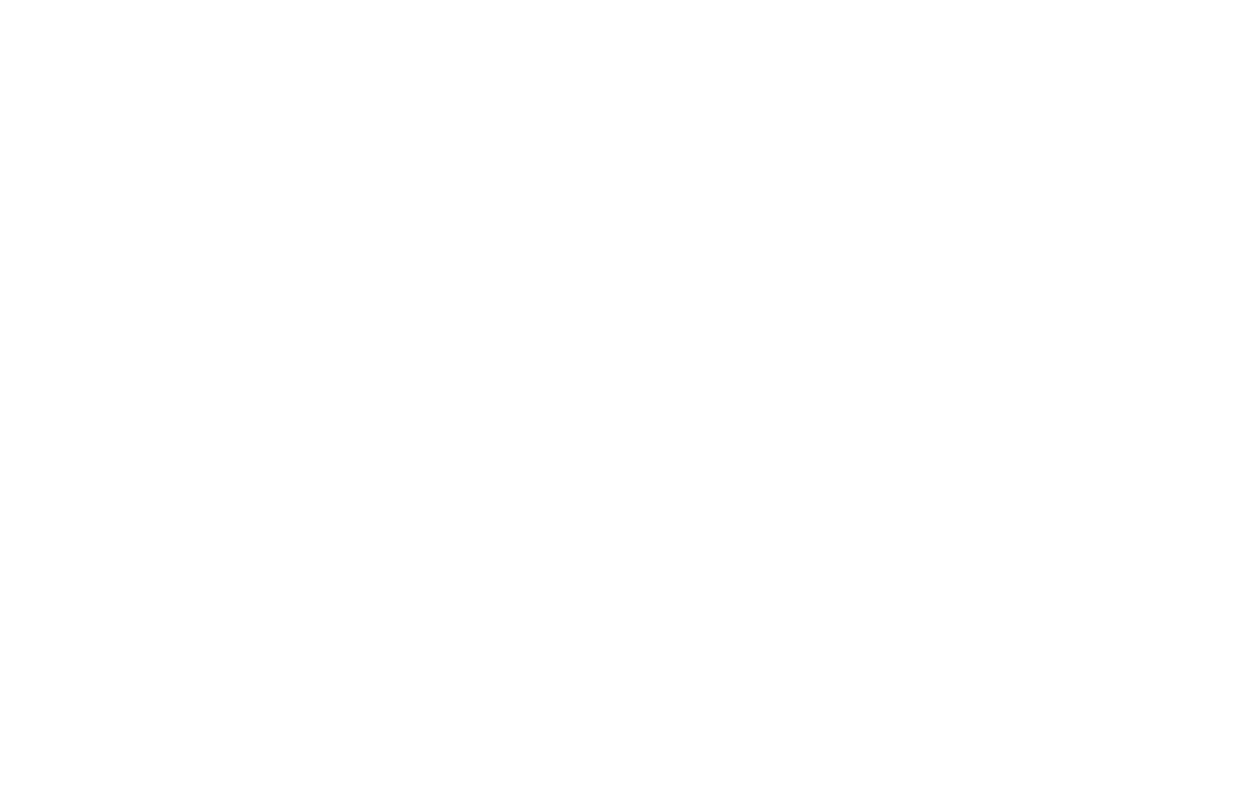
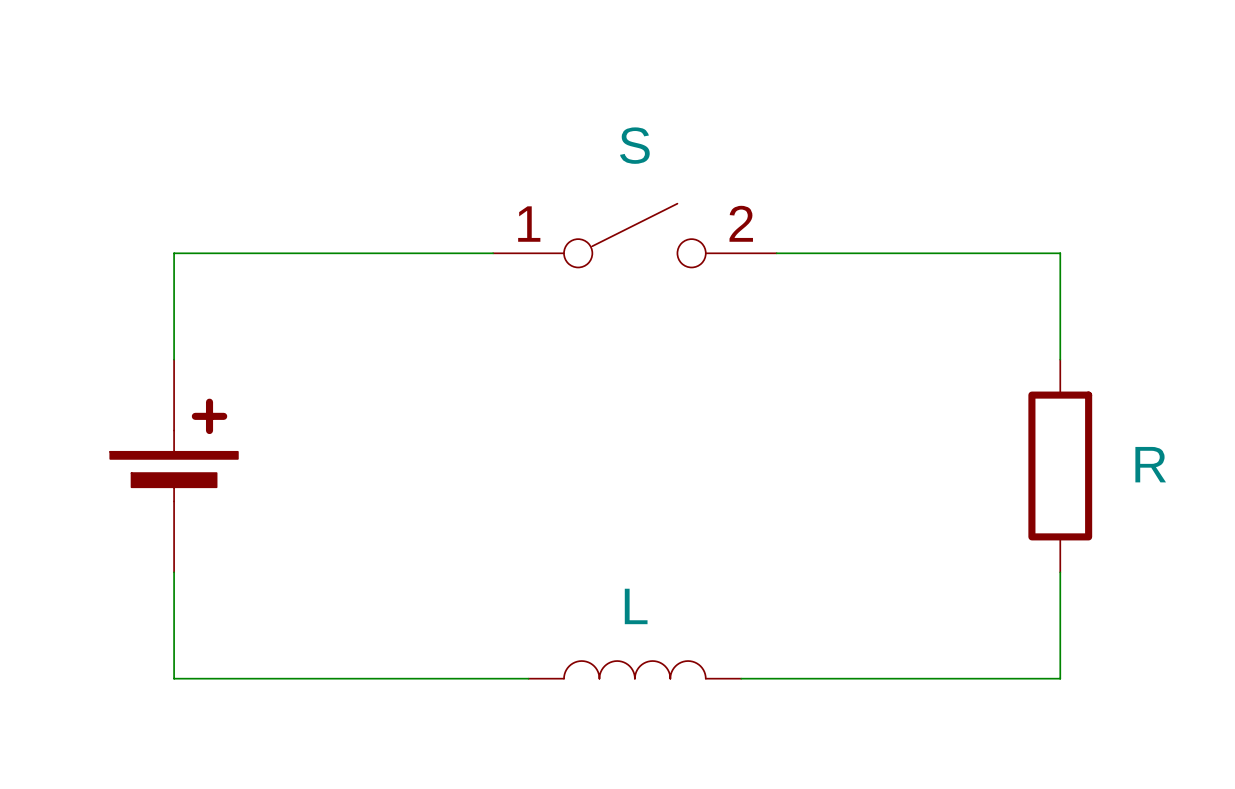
S: none -> (634, 235)
wire: none -> (493, 253) (174, 253) (174, 359)
wire: none -> (776, 253) (1060, 253) (1060, 359)
part: none -> (174, 465)
R: none -> (1060, 465)
wire: none -> (174, 572) (174, 678) (528, 678)
wire: none -> (1060, 572) (1060, 678) (741, 678)
part: none -> L (634, 669)

